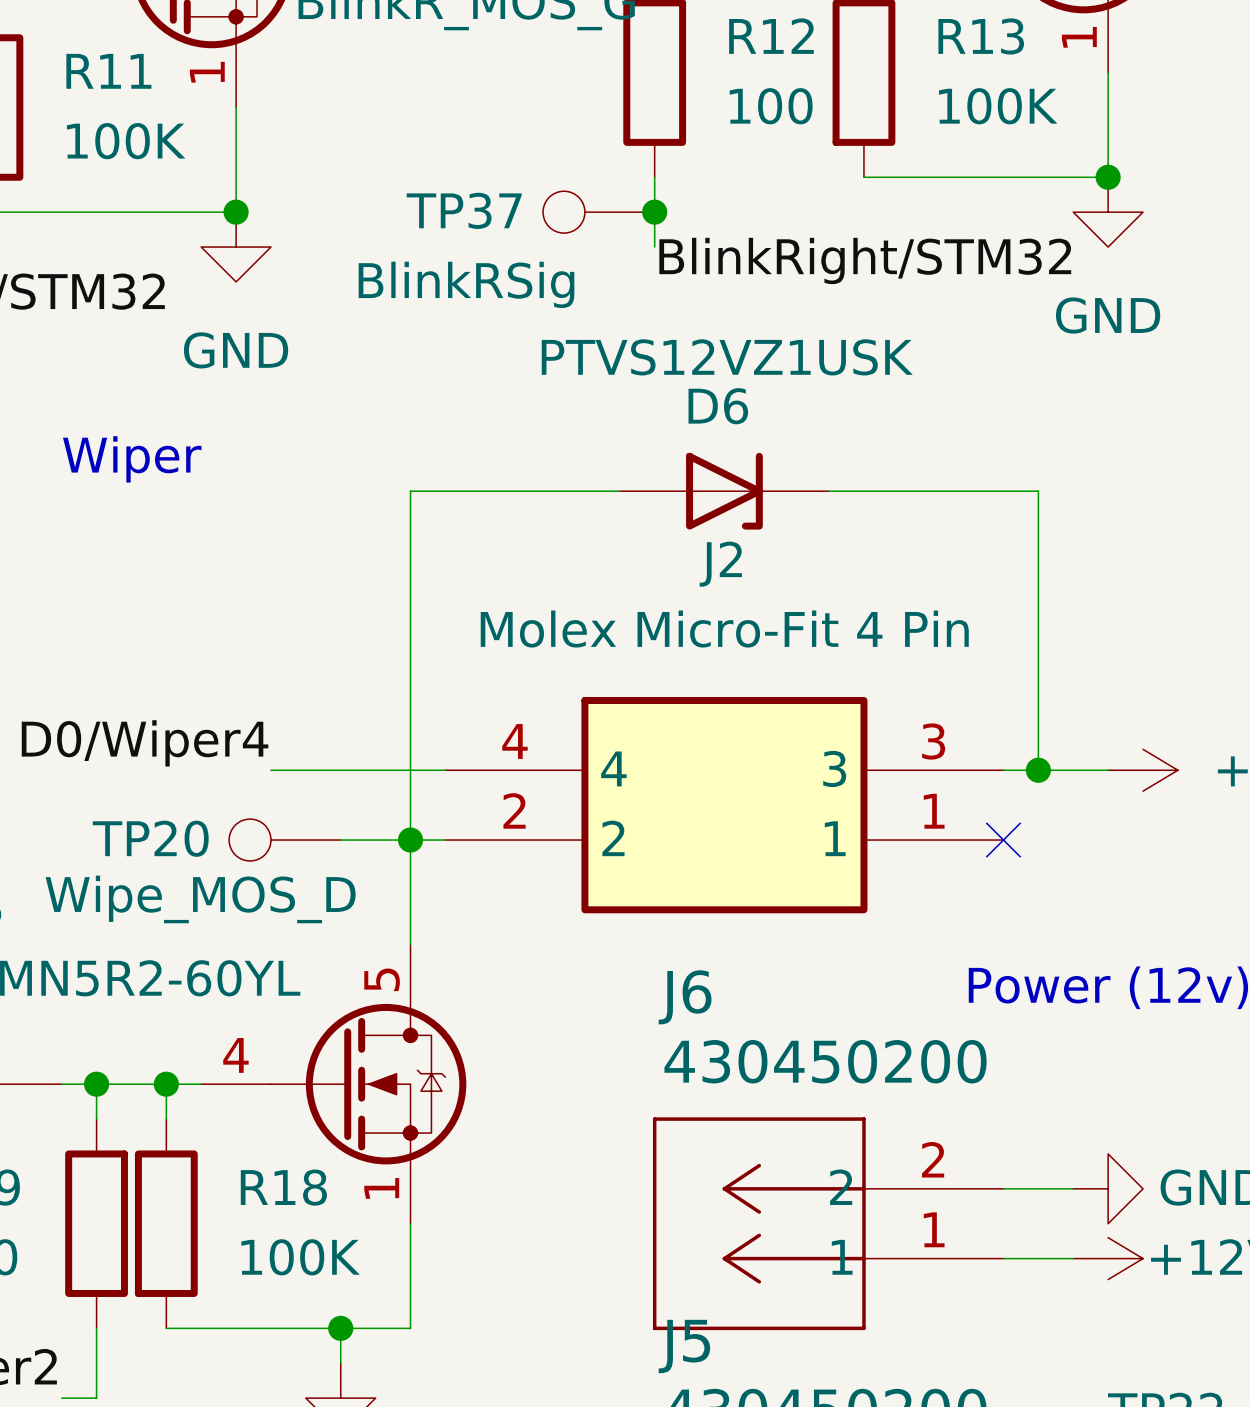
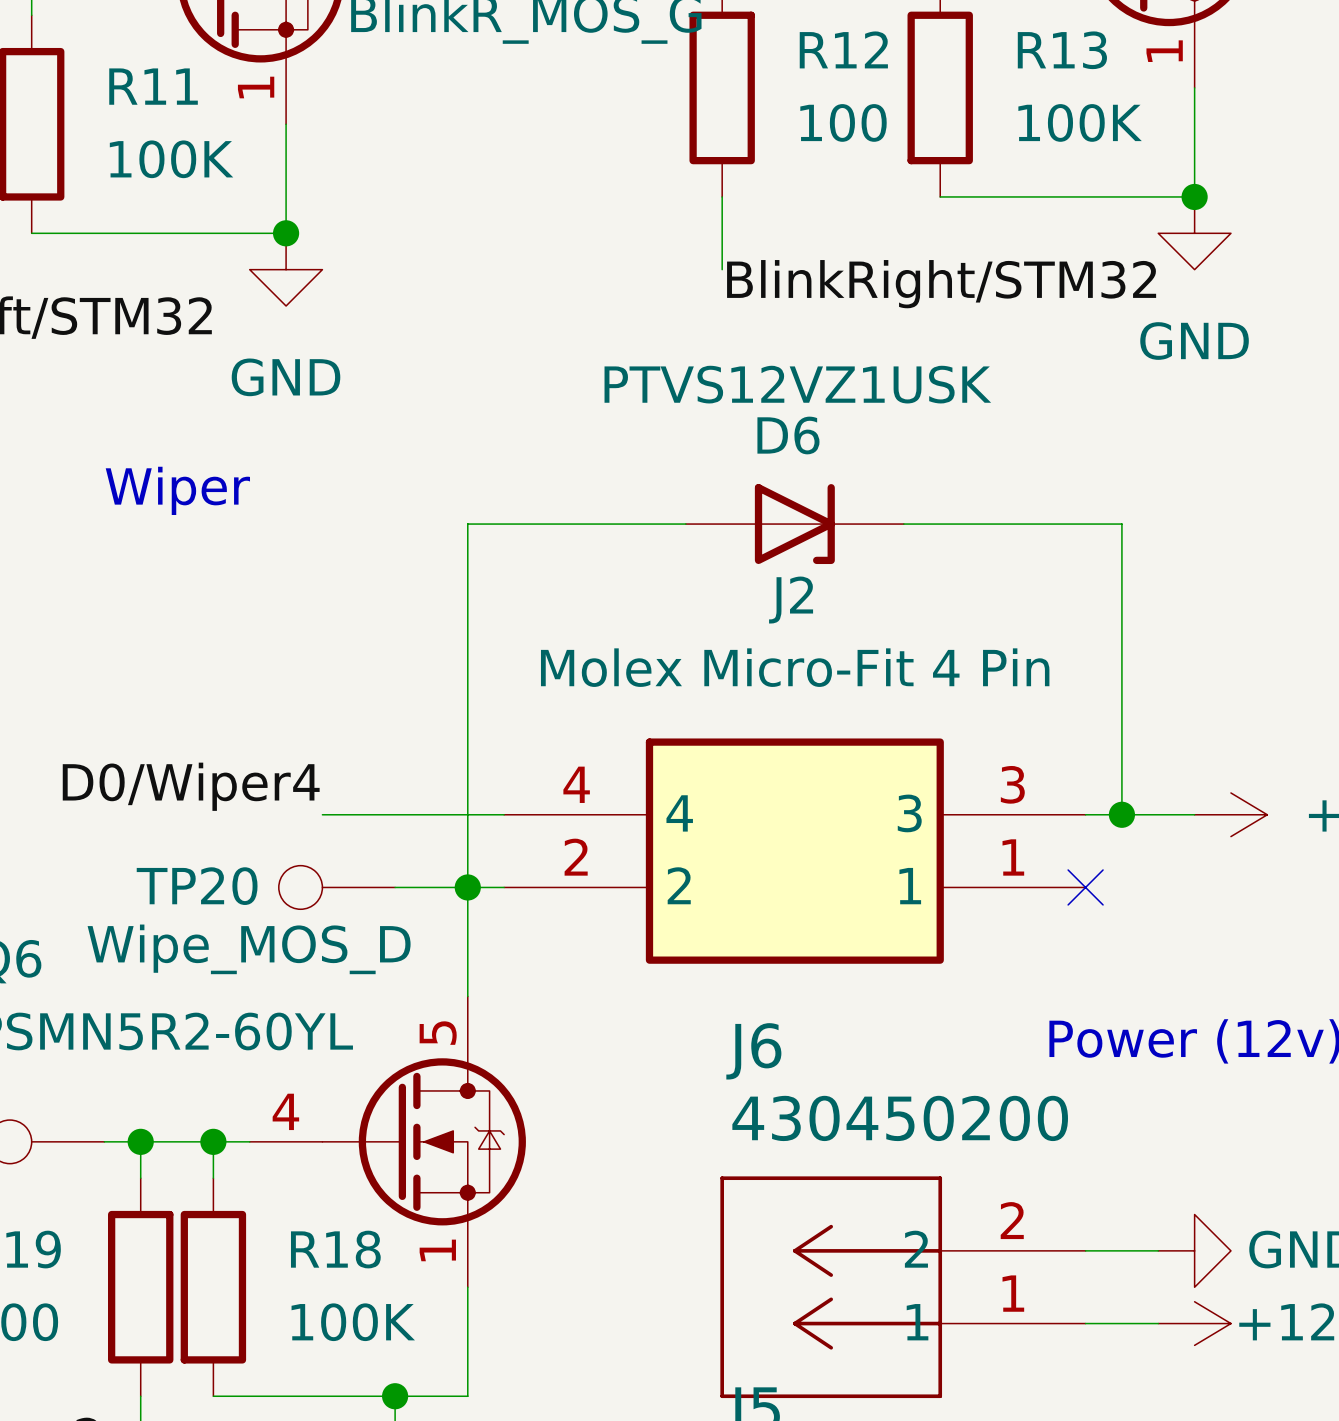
TP37: BlinkRSig (598, 212) -> none
junction: (654, 212) -> none

